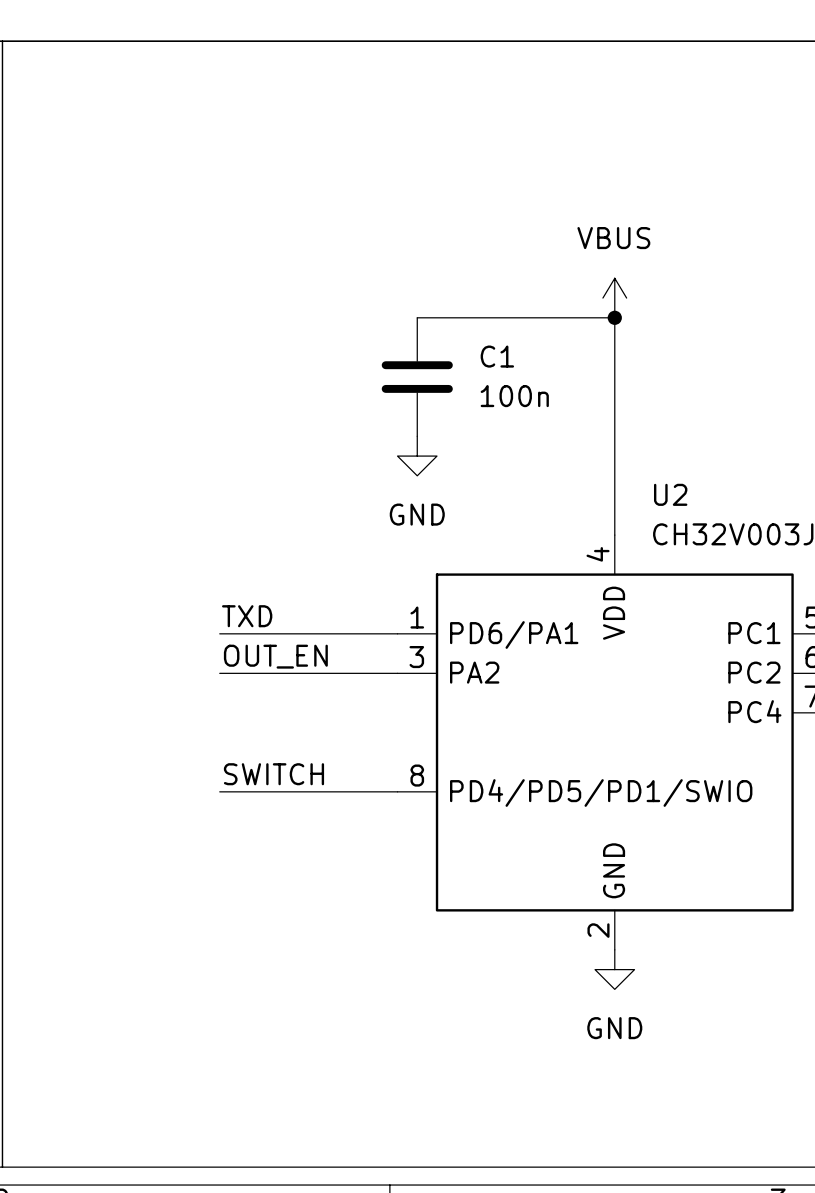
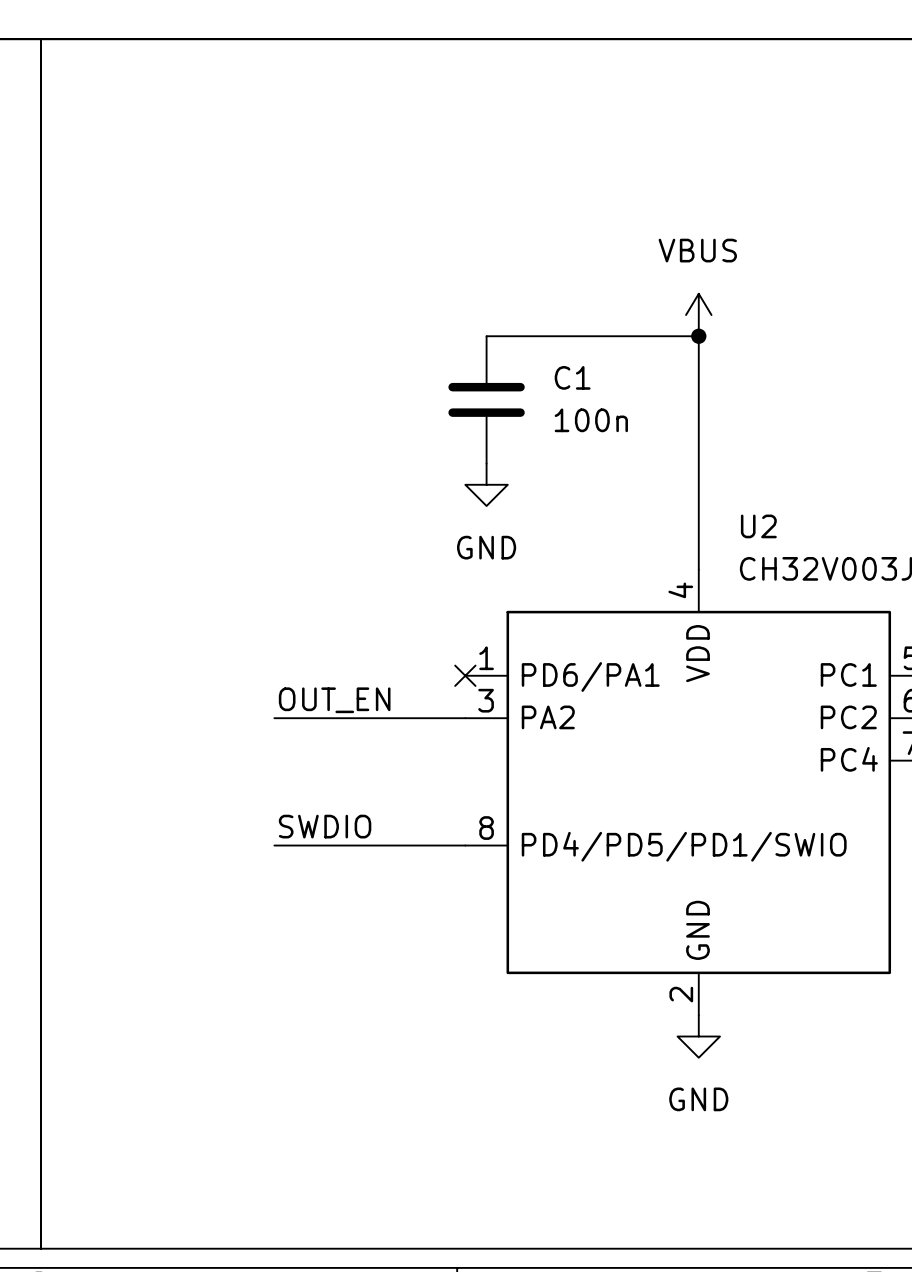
label: TXD (247, 616) -> none
wire: (219, 633) (397, 633) -> none
no-connect mark: none -> (465, 675)
label: SWITCH (273, 774) -> SWDIO (325, 826)

